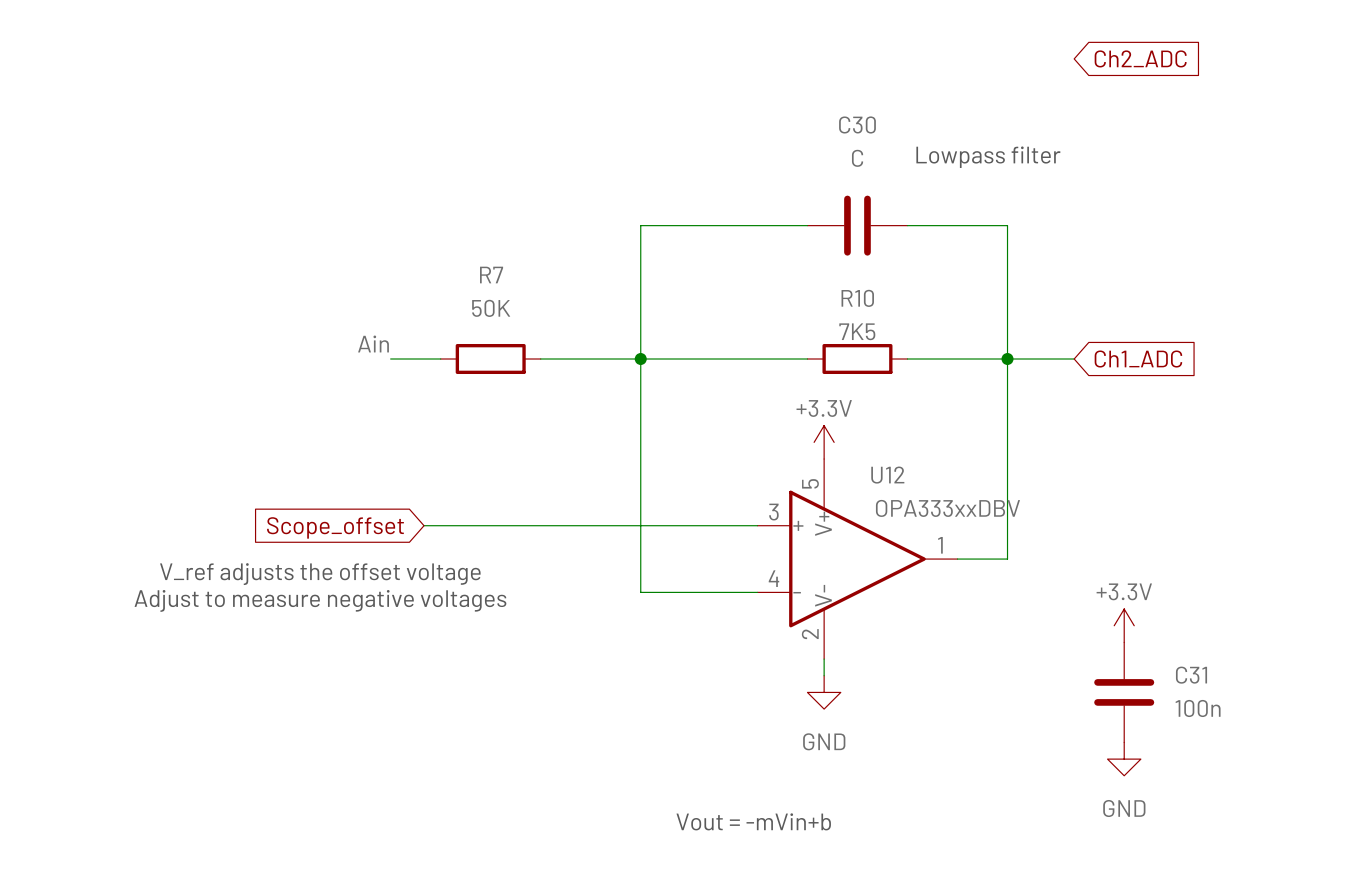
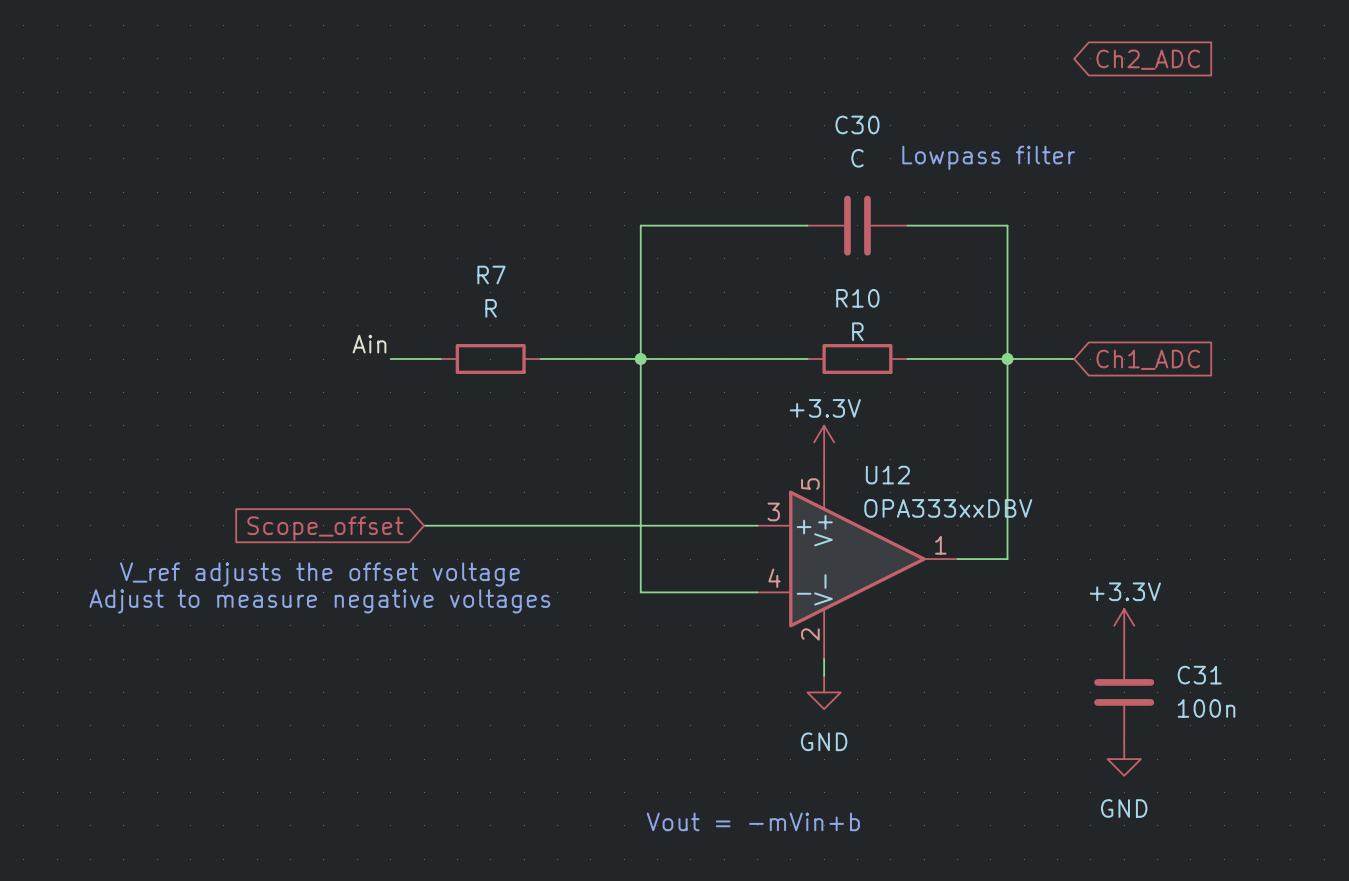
R7 value: 50K (491, 308) -> R (491, 308)
R10 value: 7K5 (857, 331) -> R (857, 331)

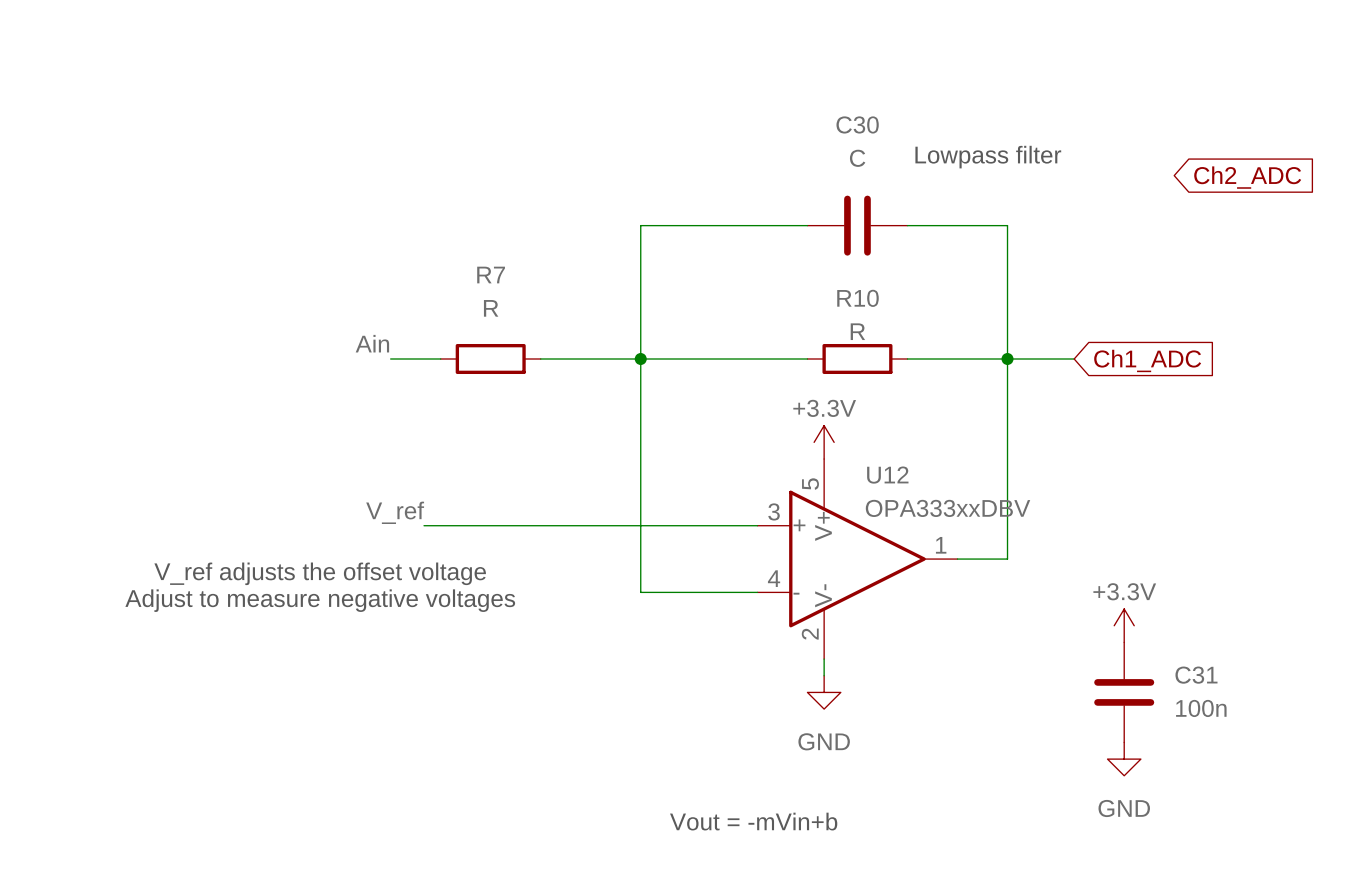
global label position: Ch2_ADC (1148, 59) -> Ch2_ADC (1247, 177)
label: none -> V_ref (395, 512)
global label: Scope_offset (325, 528) -> none

